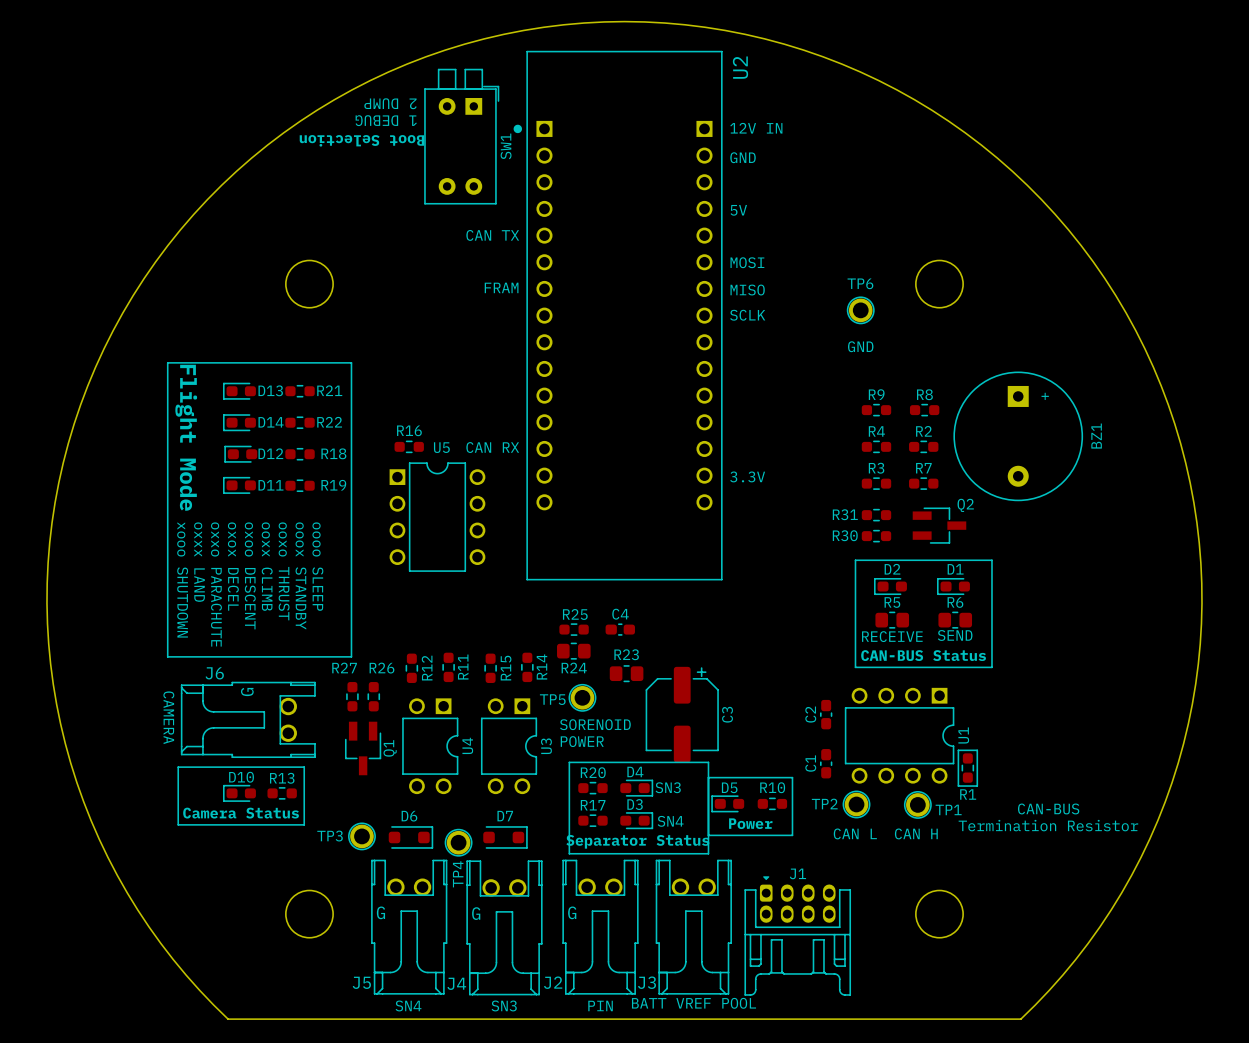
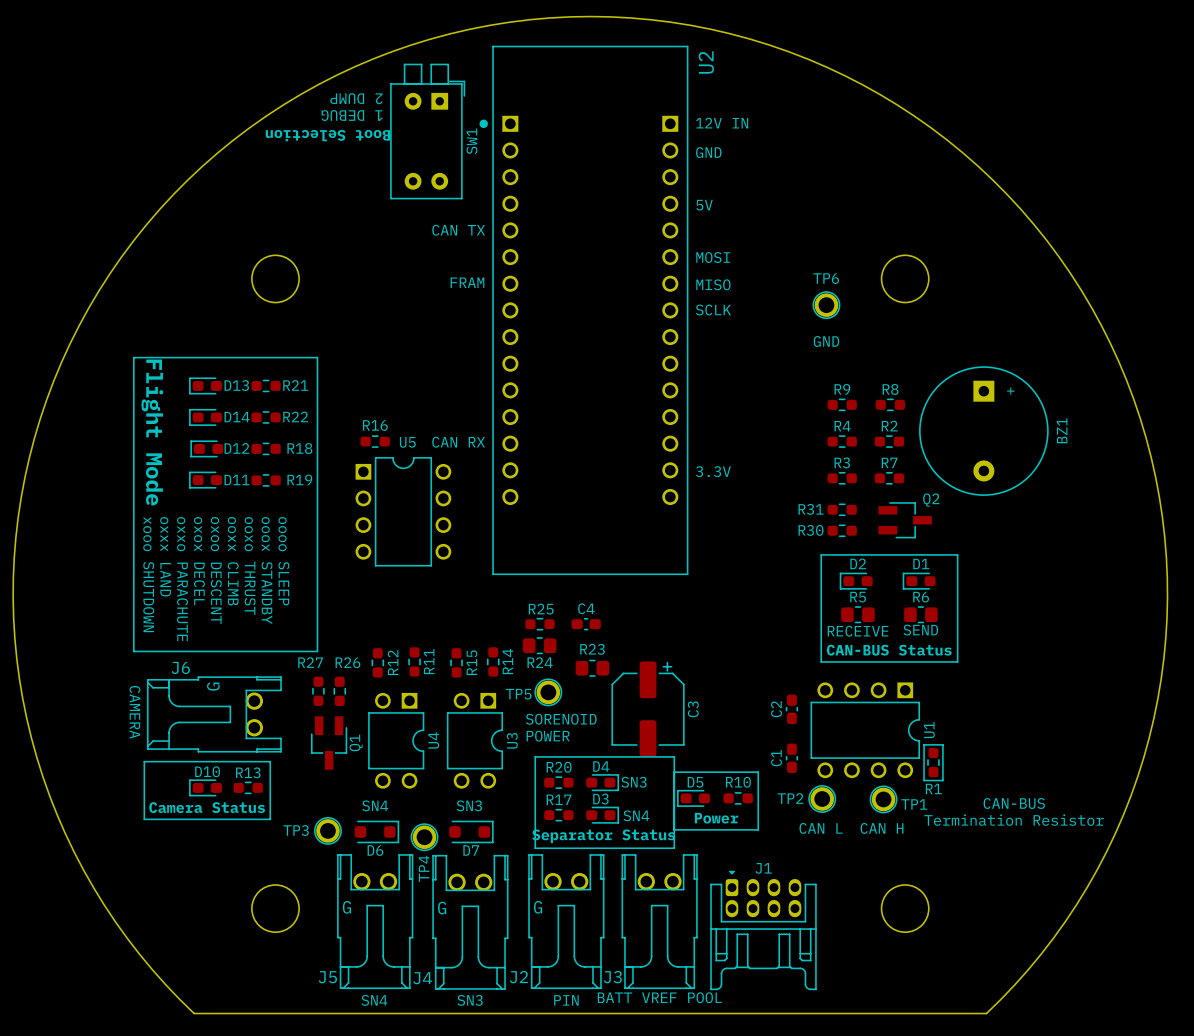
text: none -> SN4 (375, 805)
text: none -> SN3 (469, 805)
D6 name position: D6 (409, 816) -> D6 (375, 850)
D7 name position: D7 (505, 816) -> D7 (471, 850)

